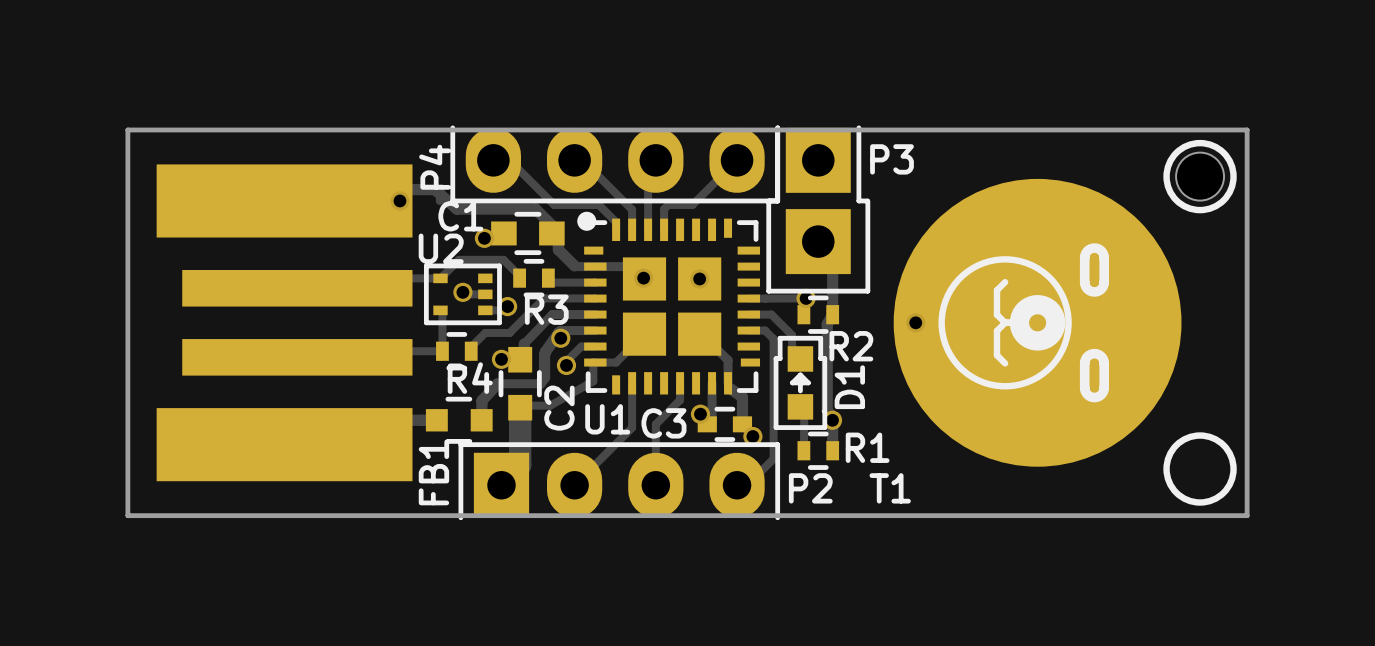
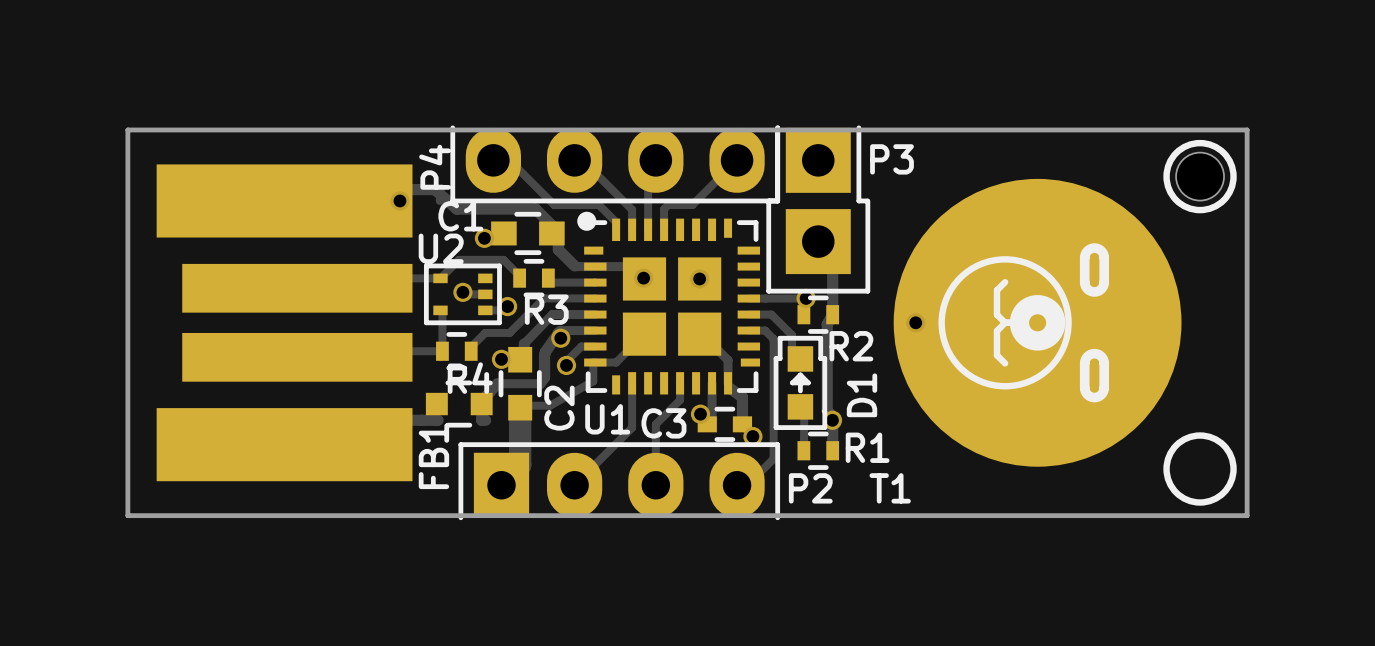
part footprint: [156, 164, 413, 482] -> [156, 164, 413, 482]
D1 name position: D1 (849, 387) -> D1 (862, 395)
FB1 position: (459, 420) -> (459, 404)

